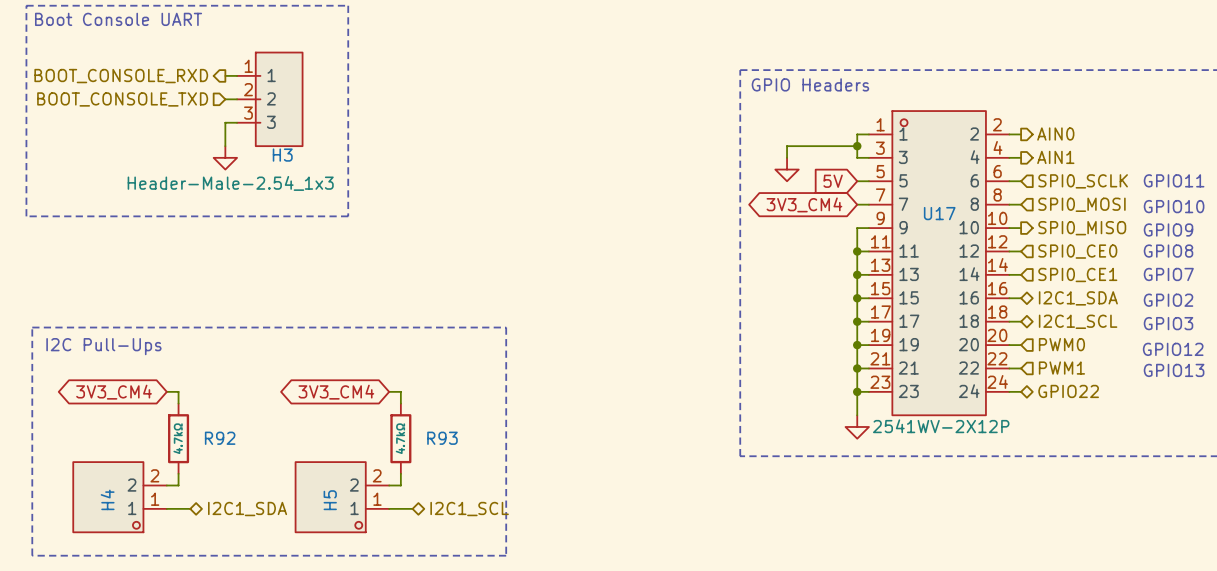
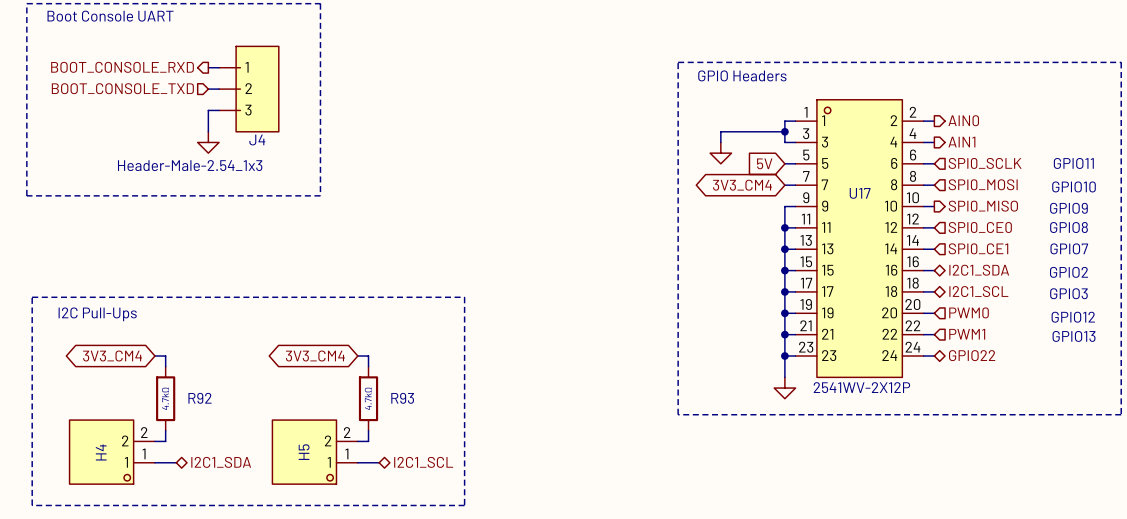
H3 pin number: 1 (248, 66) -> none
H3 pin number: 2 (248, 89) -> none
H3 pin number: 3 (248, 113) -> none
H3 name: H3 (282, 155) -> J4 (257, 140)

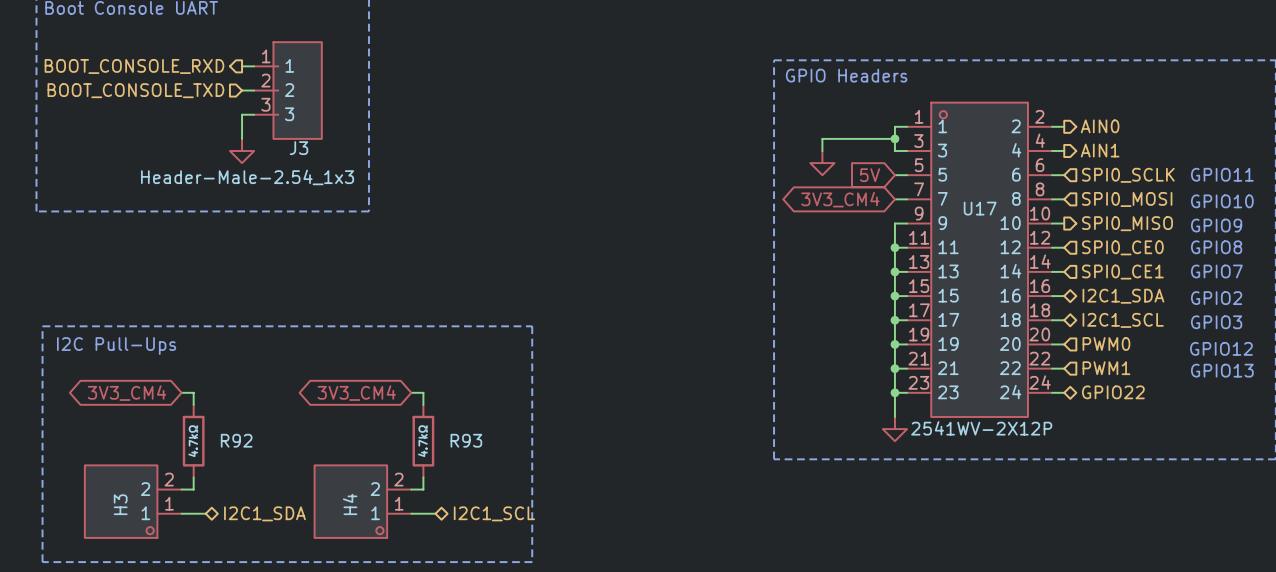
J4 pin number: none -> 1 (266, 56)
J4 pin number: none -> 2 (265, 80)
J4 pin number: none -> 3 (265, 104)
J4 name: J4 (257, 140) -> J3 (299, 148)
H4 name: H4 (101, 452) -> H3 (120, 504)
H5 name: H5 (304, 452) -> H4 (350, 504)

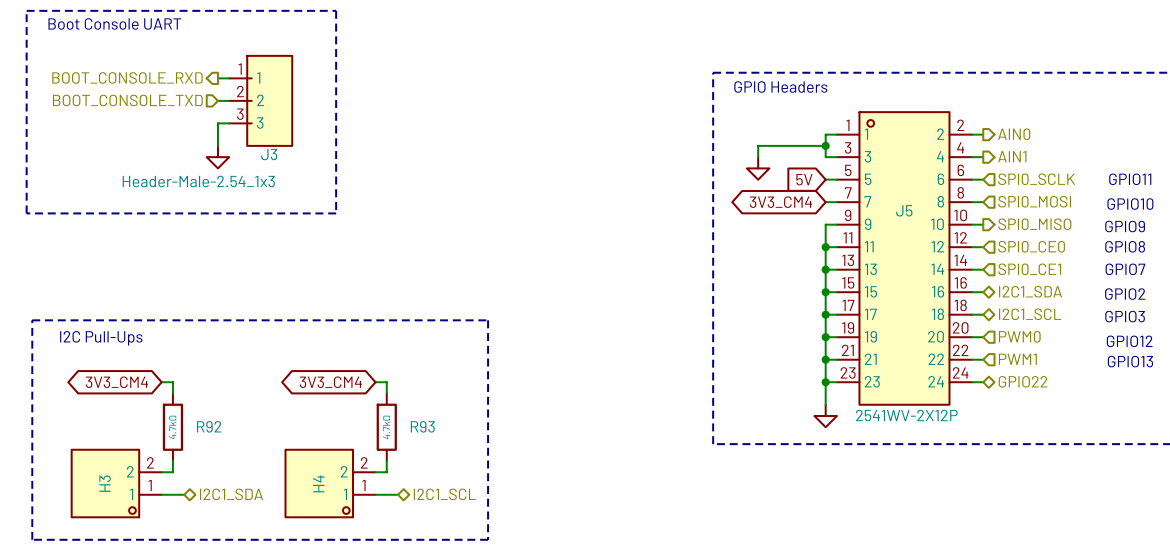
U17 name: U17 (980, 208) -> J5 (904, 210)

